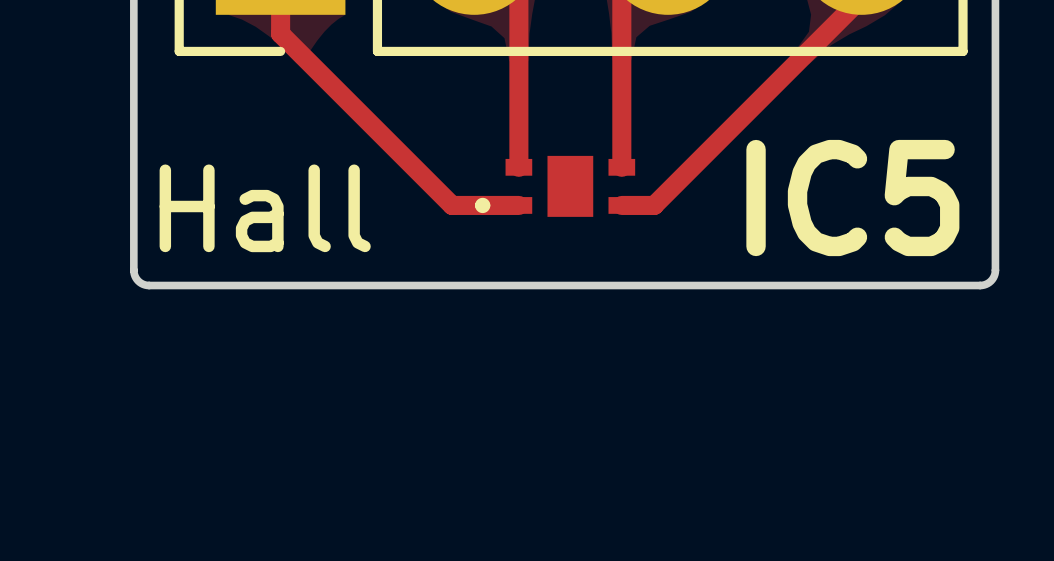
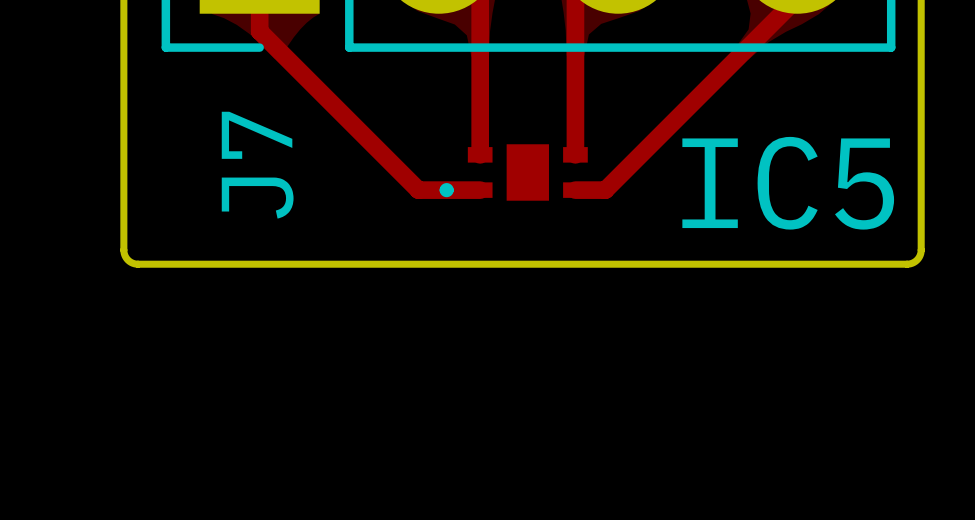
Hall name: Hall (265, 208) -> J7 (257, 165)

